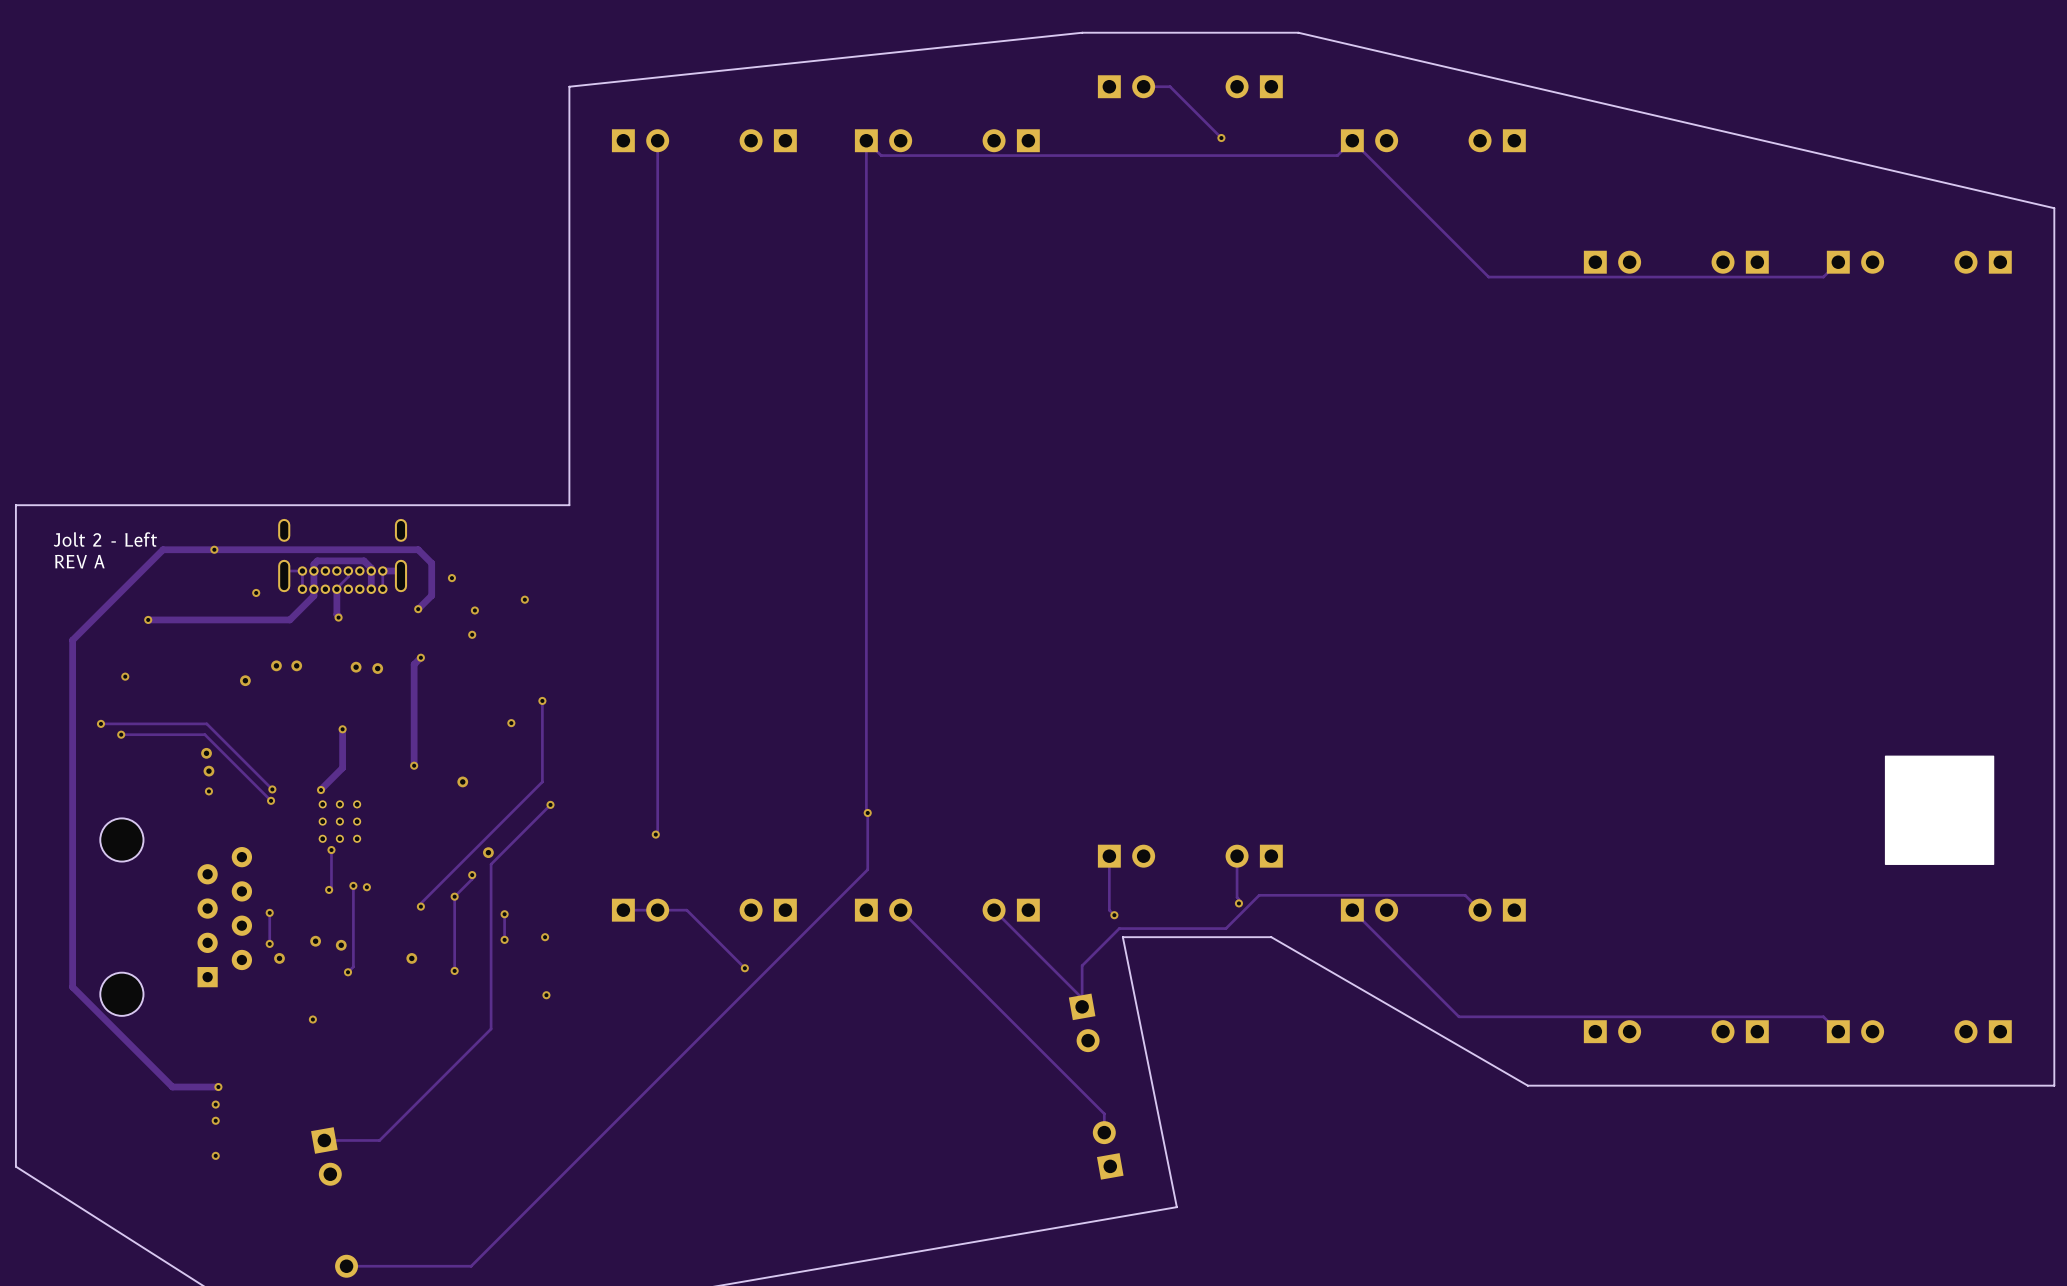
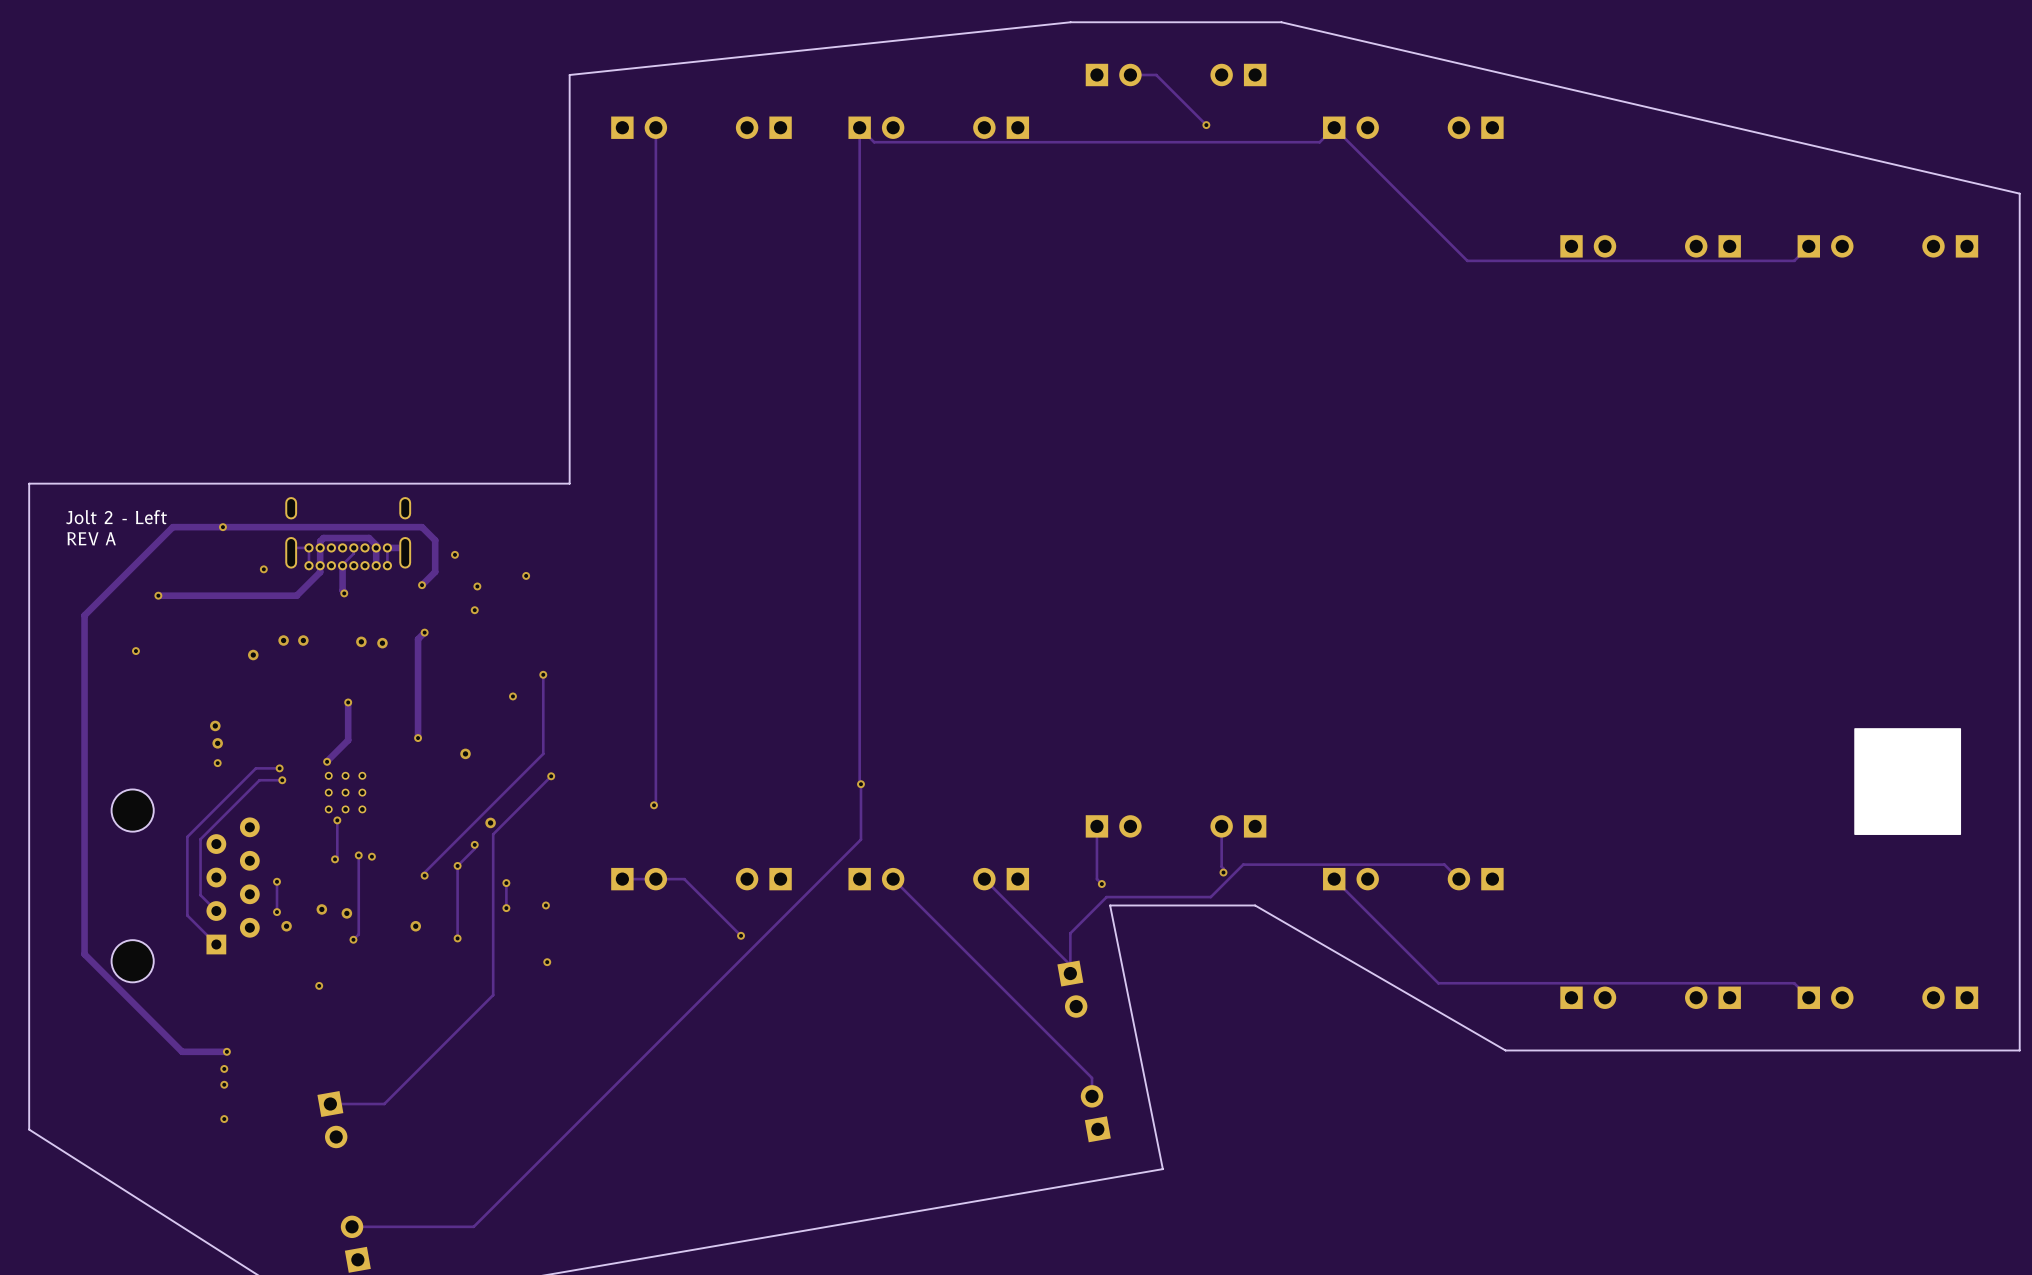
track: (100, 723) (206, 723) (272, 789) -> none
via: (100, 723) -> none
track: (121, 734) (204, 734) (271, 800) -> none
via: (121, 734) -> none
via: (272, 789) -> none
track: none -> (279, 768) (255, 768) (187, 836) (187, 915) (216, 944)
via: none -> (279, 768)
via: (271, 800) -> none
track: none -> (282, 780) (259, 780) (200, 839) (200, 895) (216, 911)
via: none -> (282, 780)

